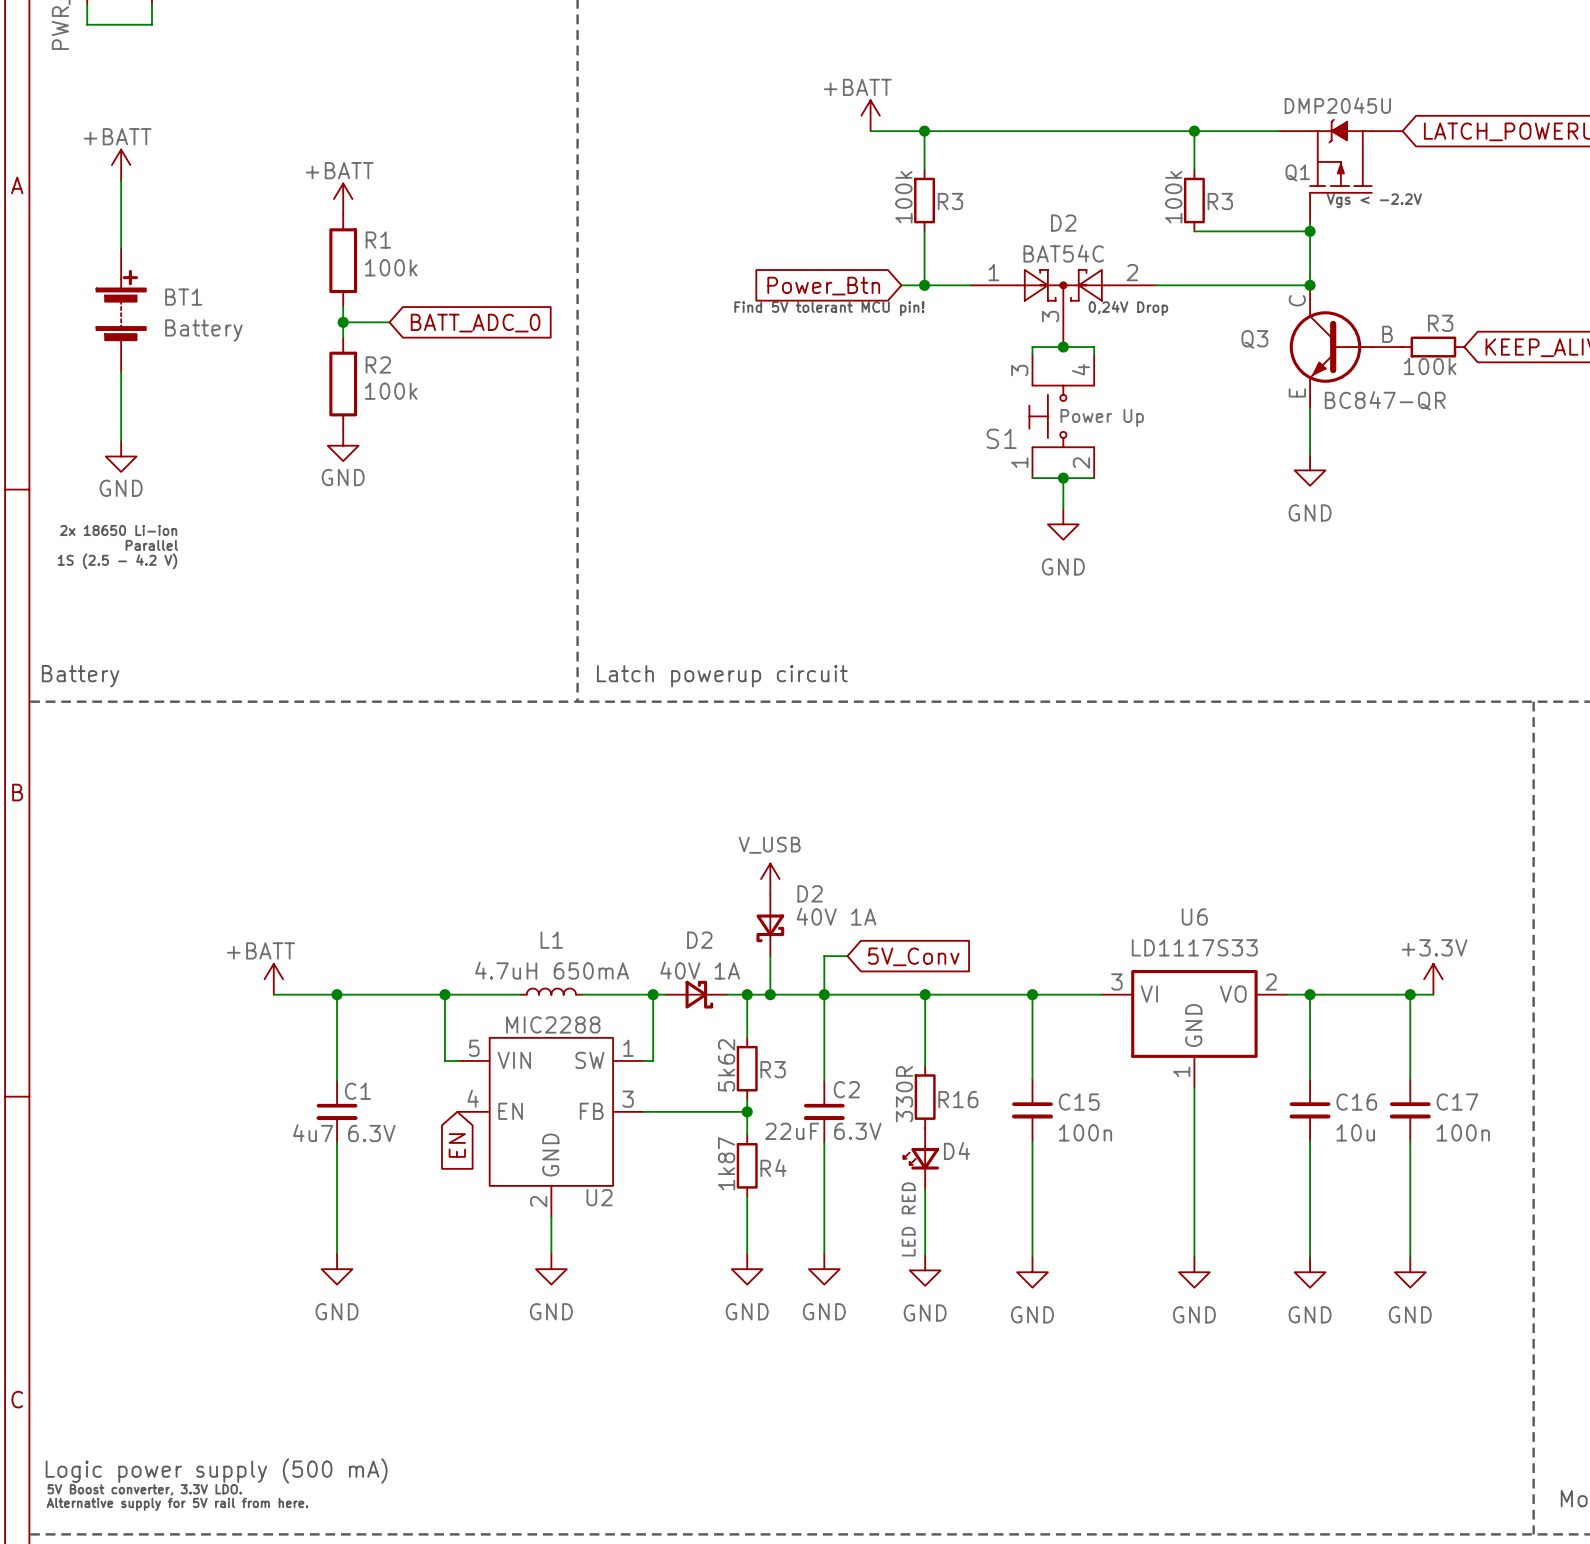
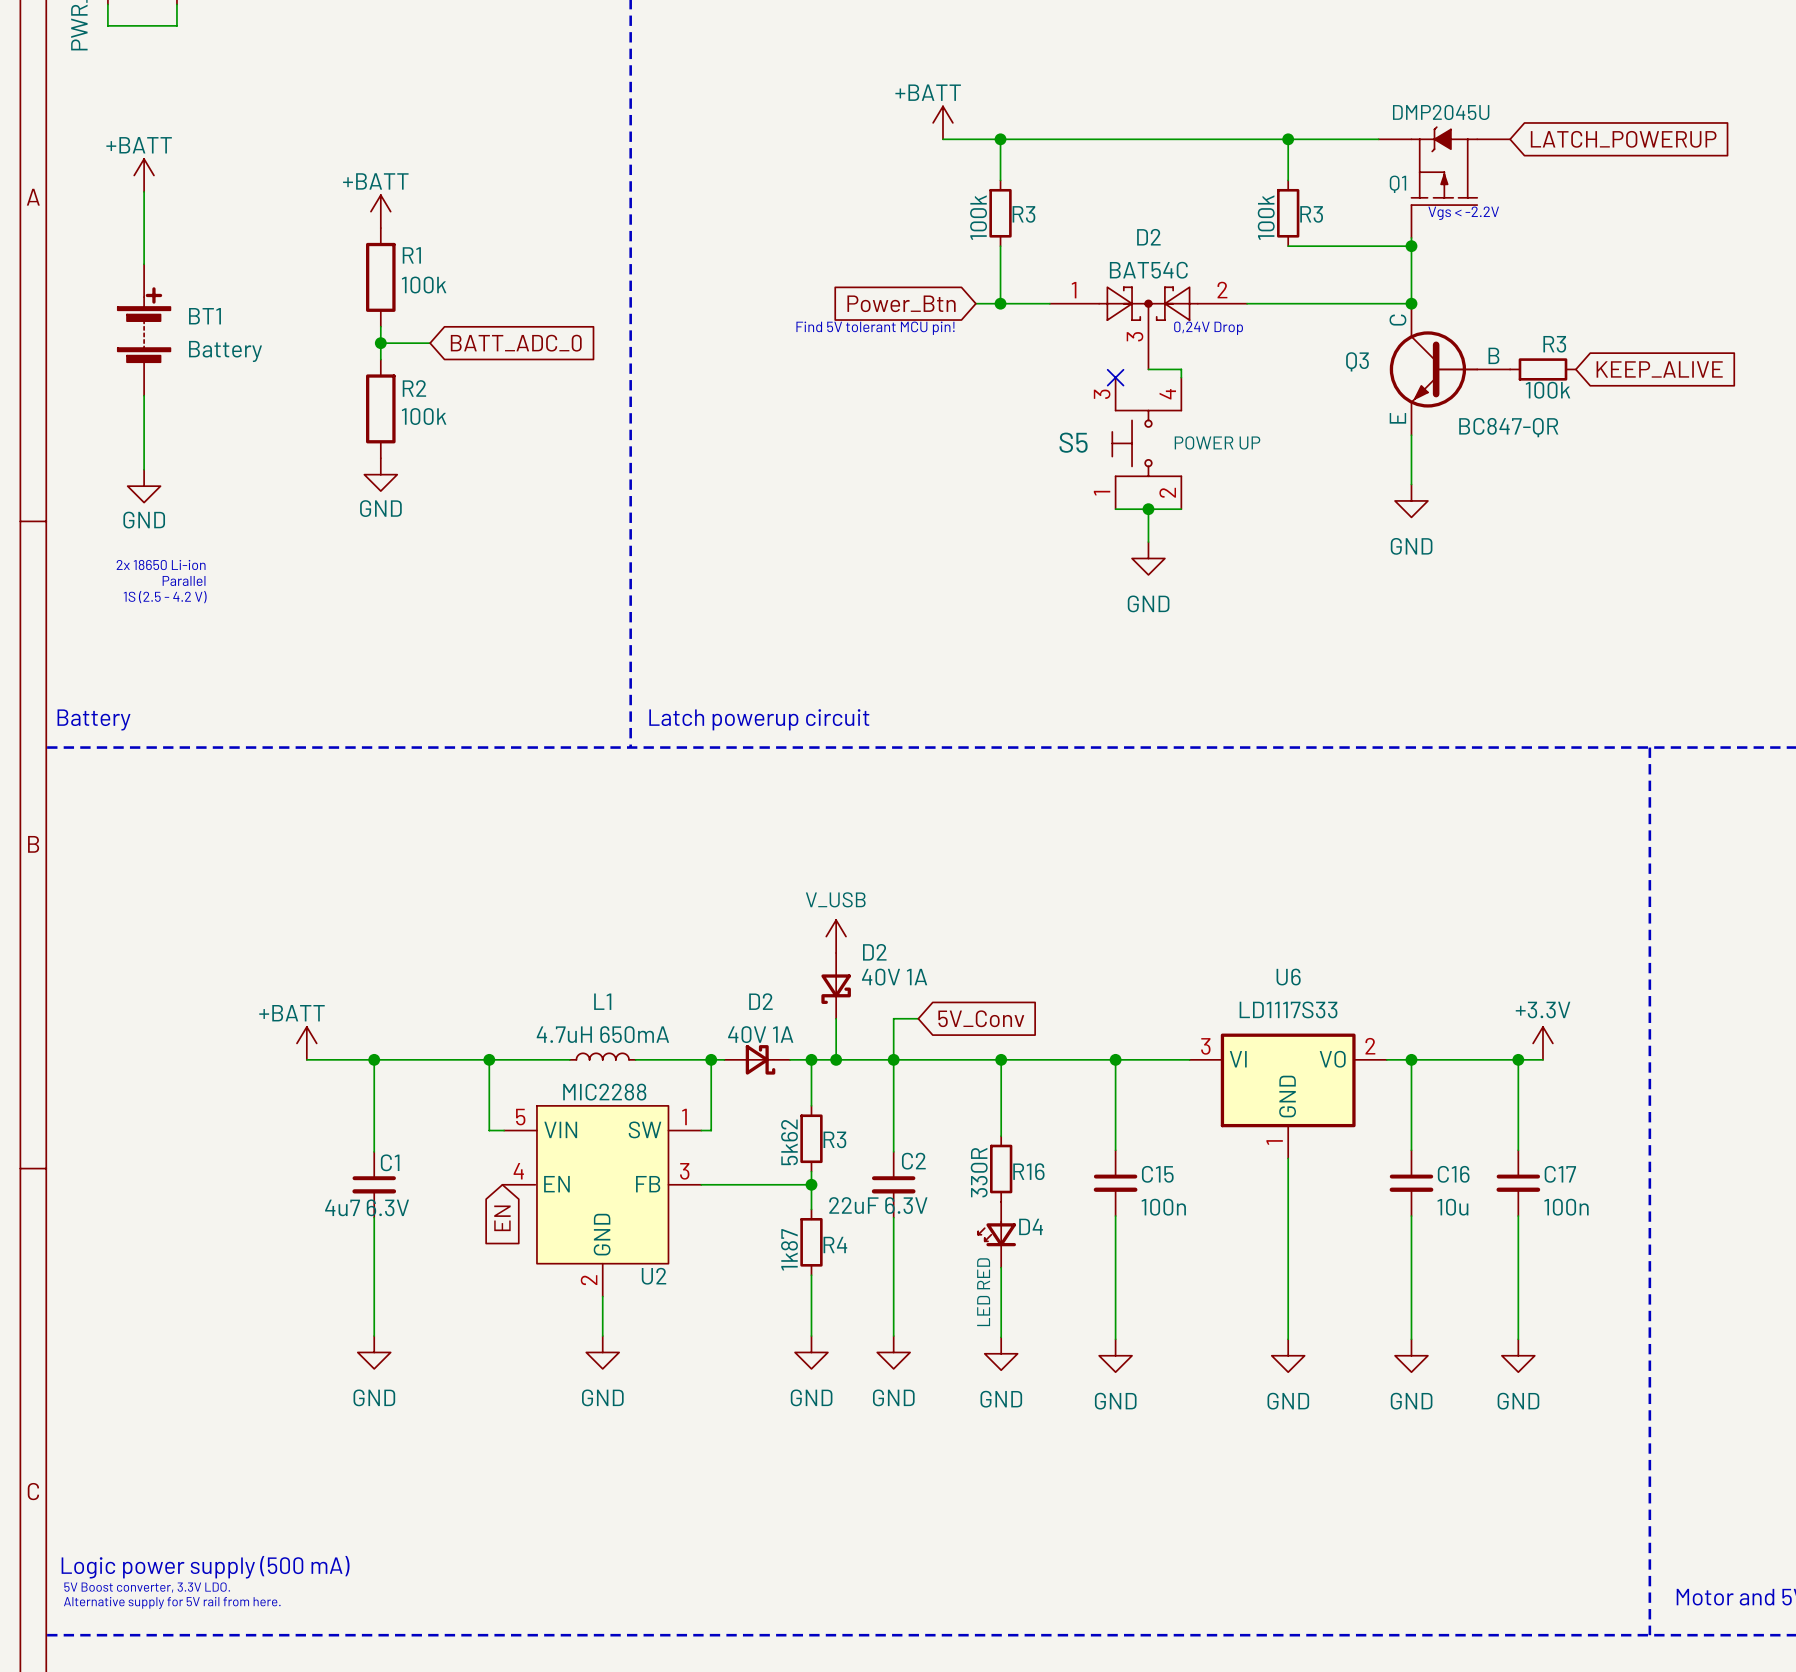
wire: (1063, 347) (1032, 347) (1032, 354) -> none
junction: (1063, 347) -> none
no-connect mark: none -> (1115, 377)
S1 value: Power Up (1102, 417) -> POWER UP (1217, 442)
S1 name: S1 (1001, 438) -> S5 (1073, 442)

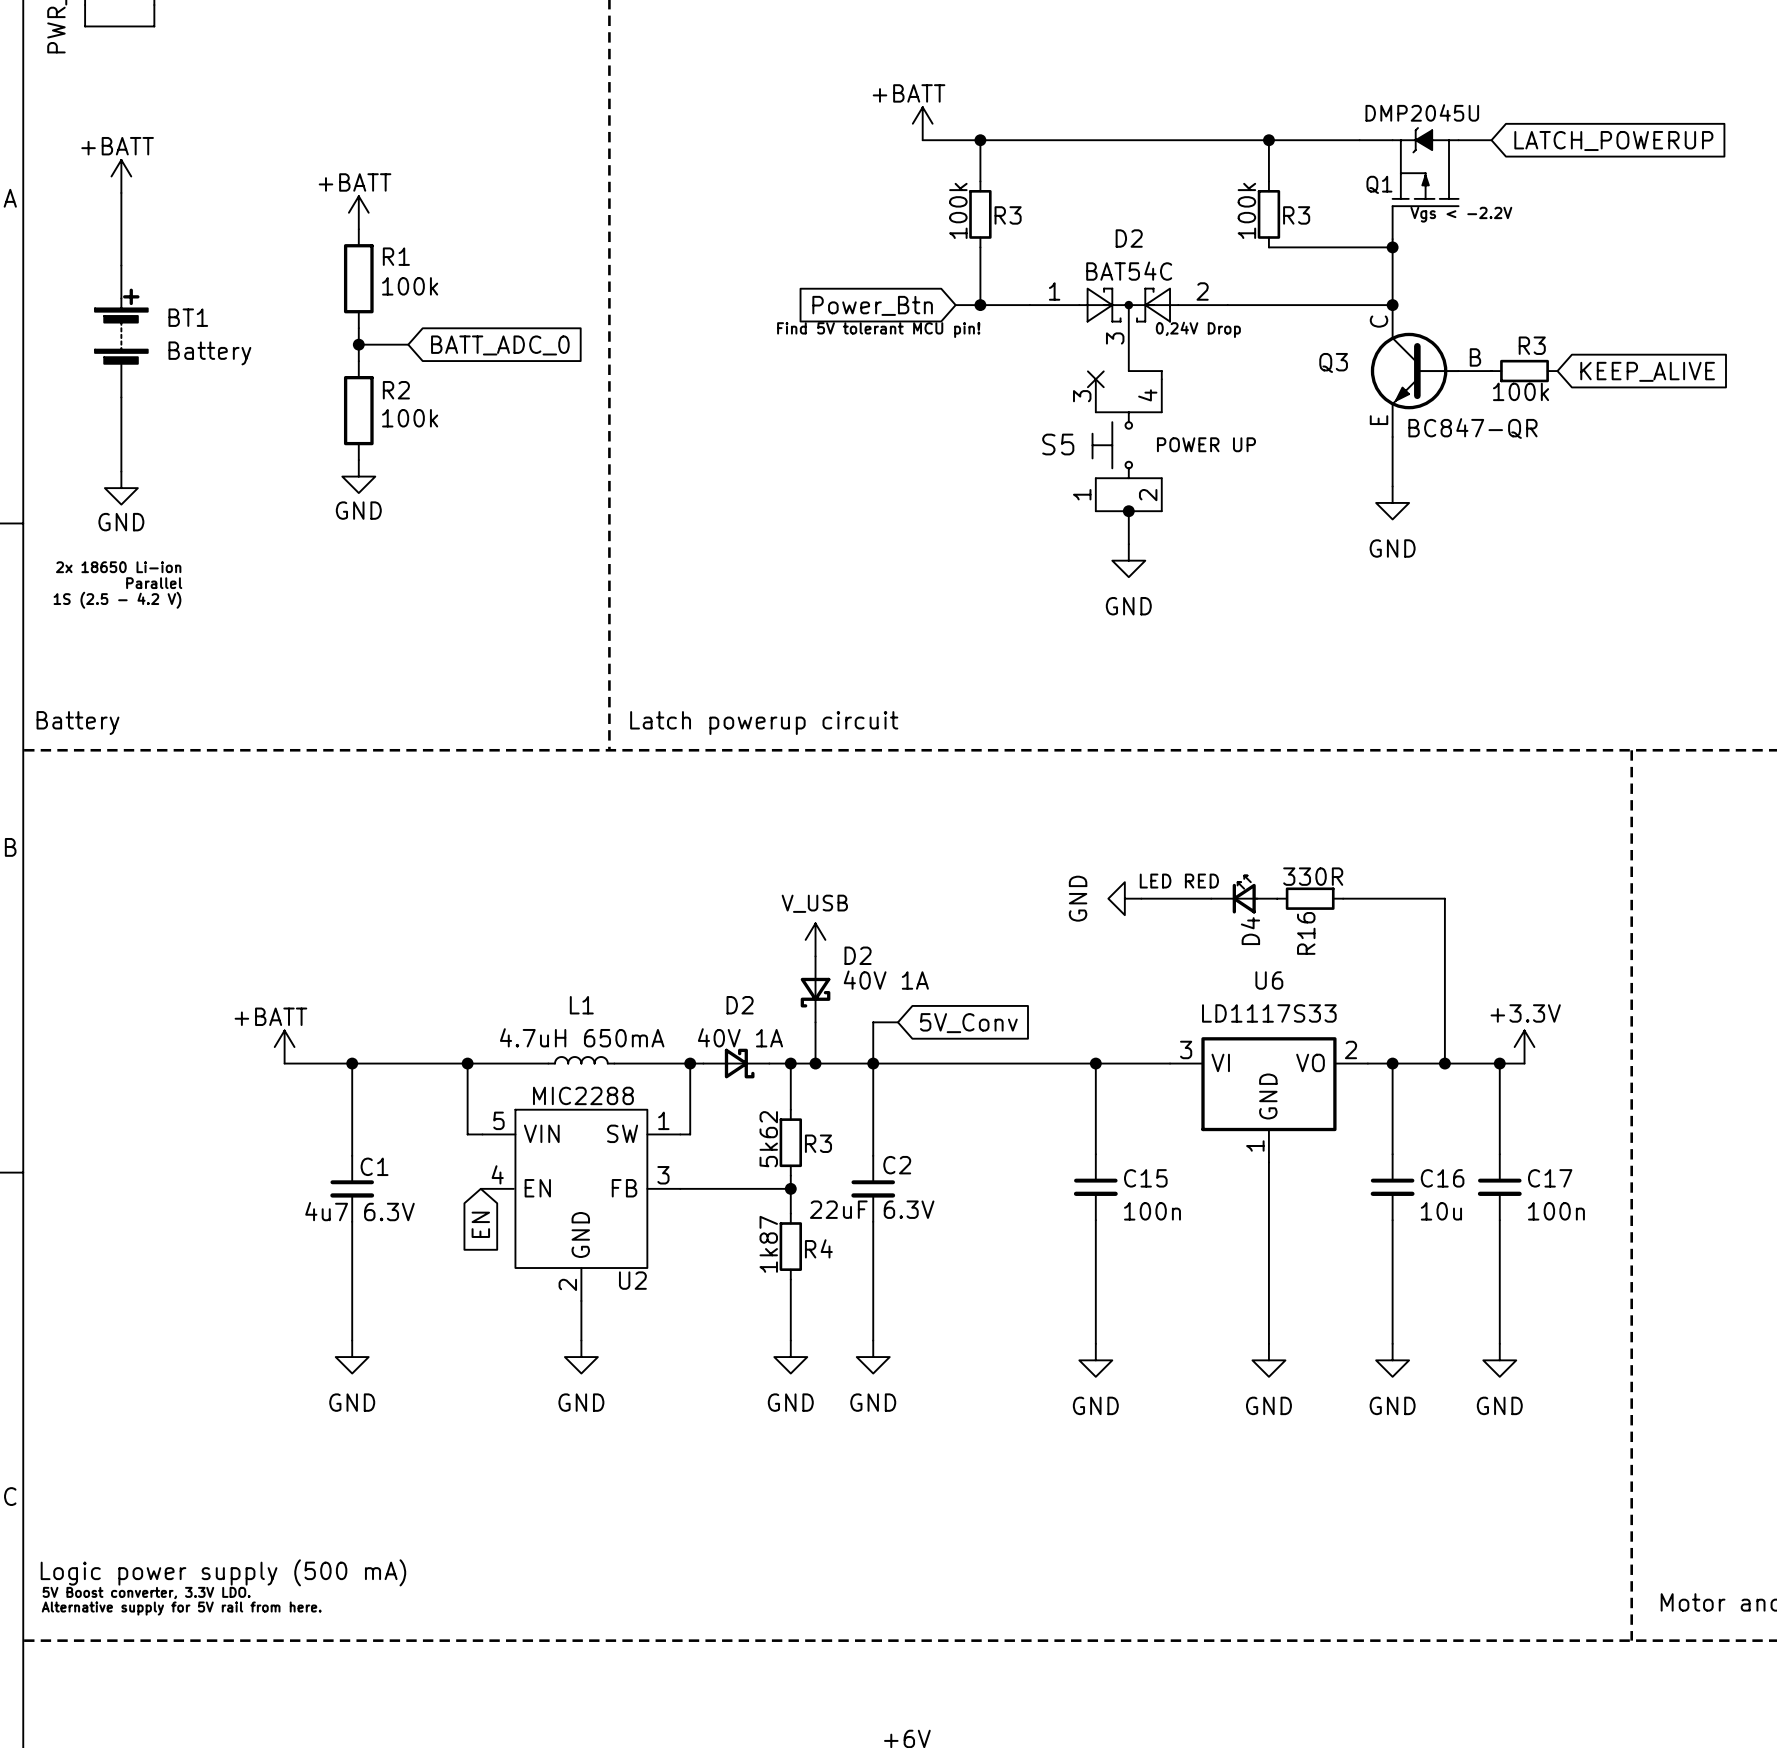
power symbol: none -> GND (1124, 898)
wire: none -> (1141, 898) (1211, 898)
wire: none -> (1343, 898) (1444, 898) (1444, 1063)
wire: (1001, 1059) (1001, 1136) -> none
junction: (1001, 1059) -> none
junction: none -> (1444, 1063)
R16 rotation: 0° (1001, 1169) -> 90° clockwise (1310, 898)
R16 position: (1001, 1169) -> (1310, 898)
D4 rotation: 0° (997, 1233) -> 90° clockwise (1245, 894)
D4 position: (997, 1234) -> (1244, 894)
wire: (1001, 1267) (1001, 1337) -> none
power symbol: GND (1001, 1353) -> none

